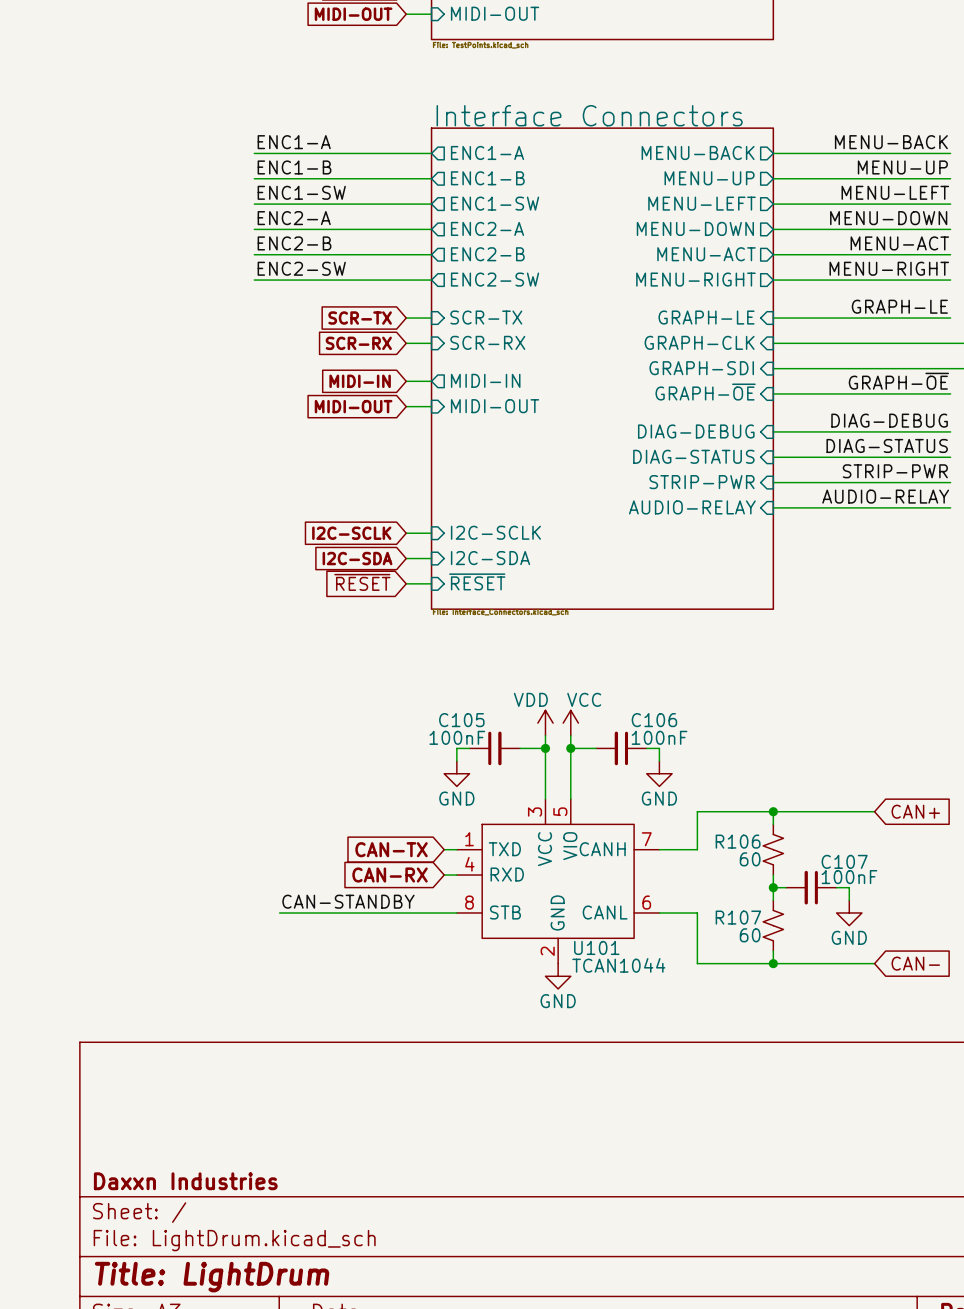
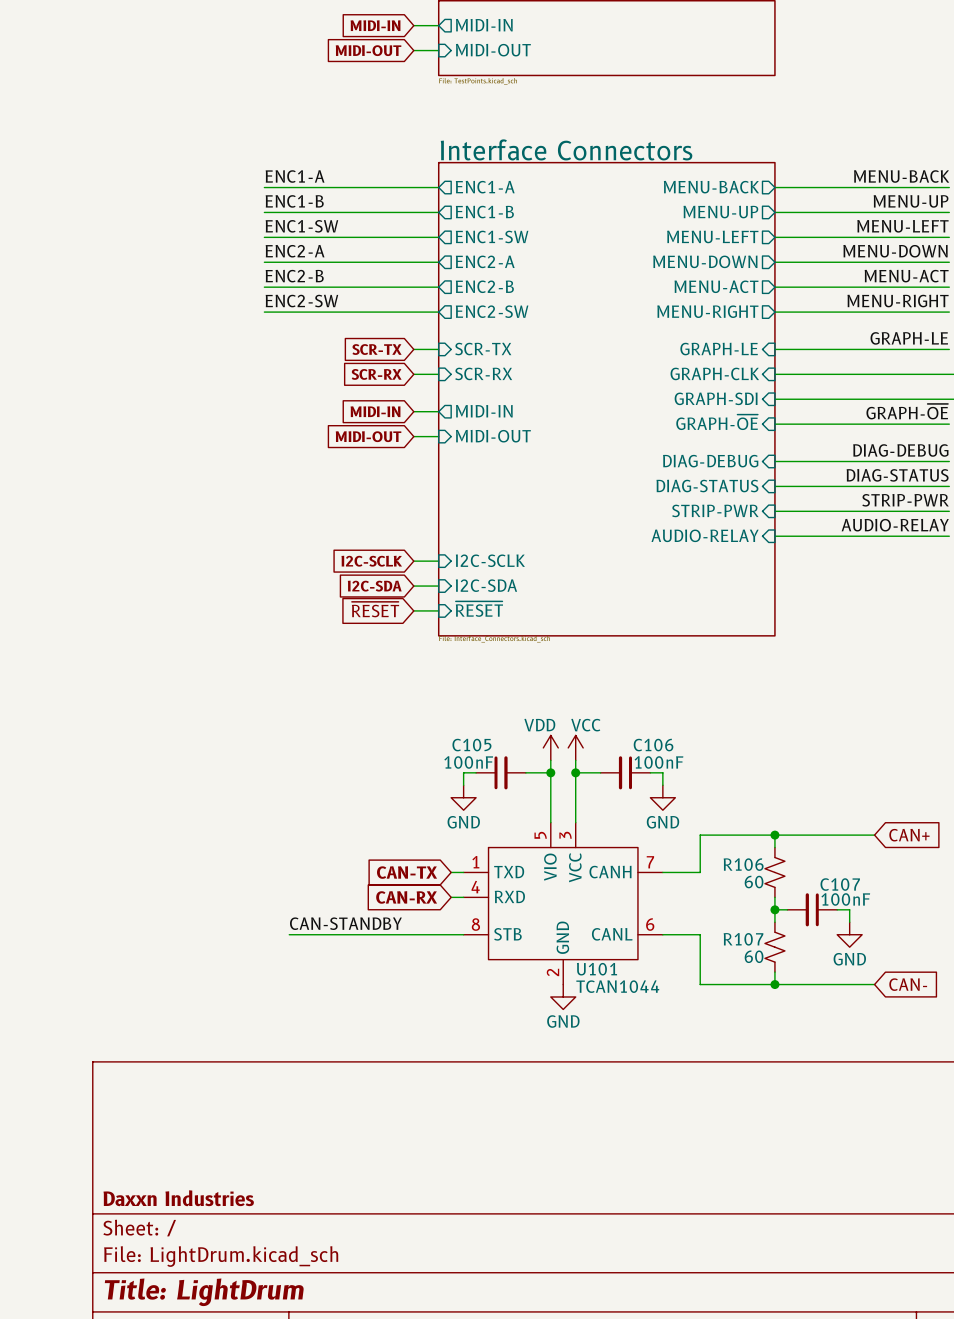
U101 pin number: 5 (560, 811) -> 3 (565, 835)
U101 pin number: 3 (535, 812) -> 5 (540, 835)
U101 pin name: VIO (570, 846) -> VCC (575, 867)
U101 pin name: VCC (545, 849) -> VIO (550, 867)

